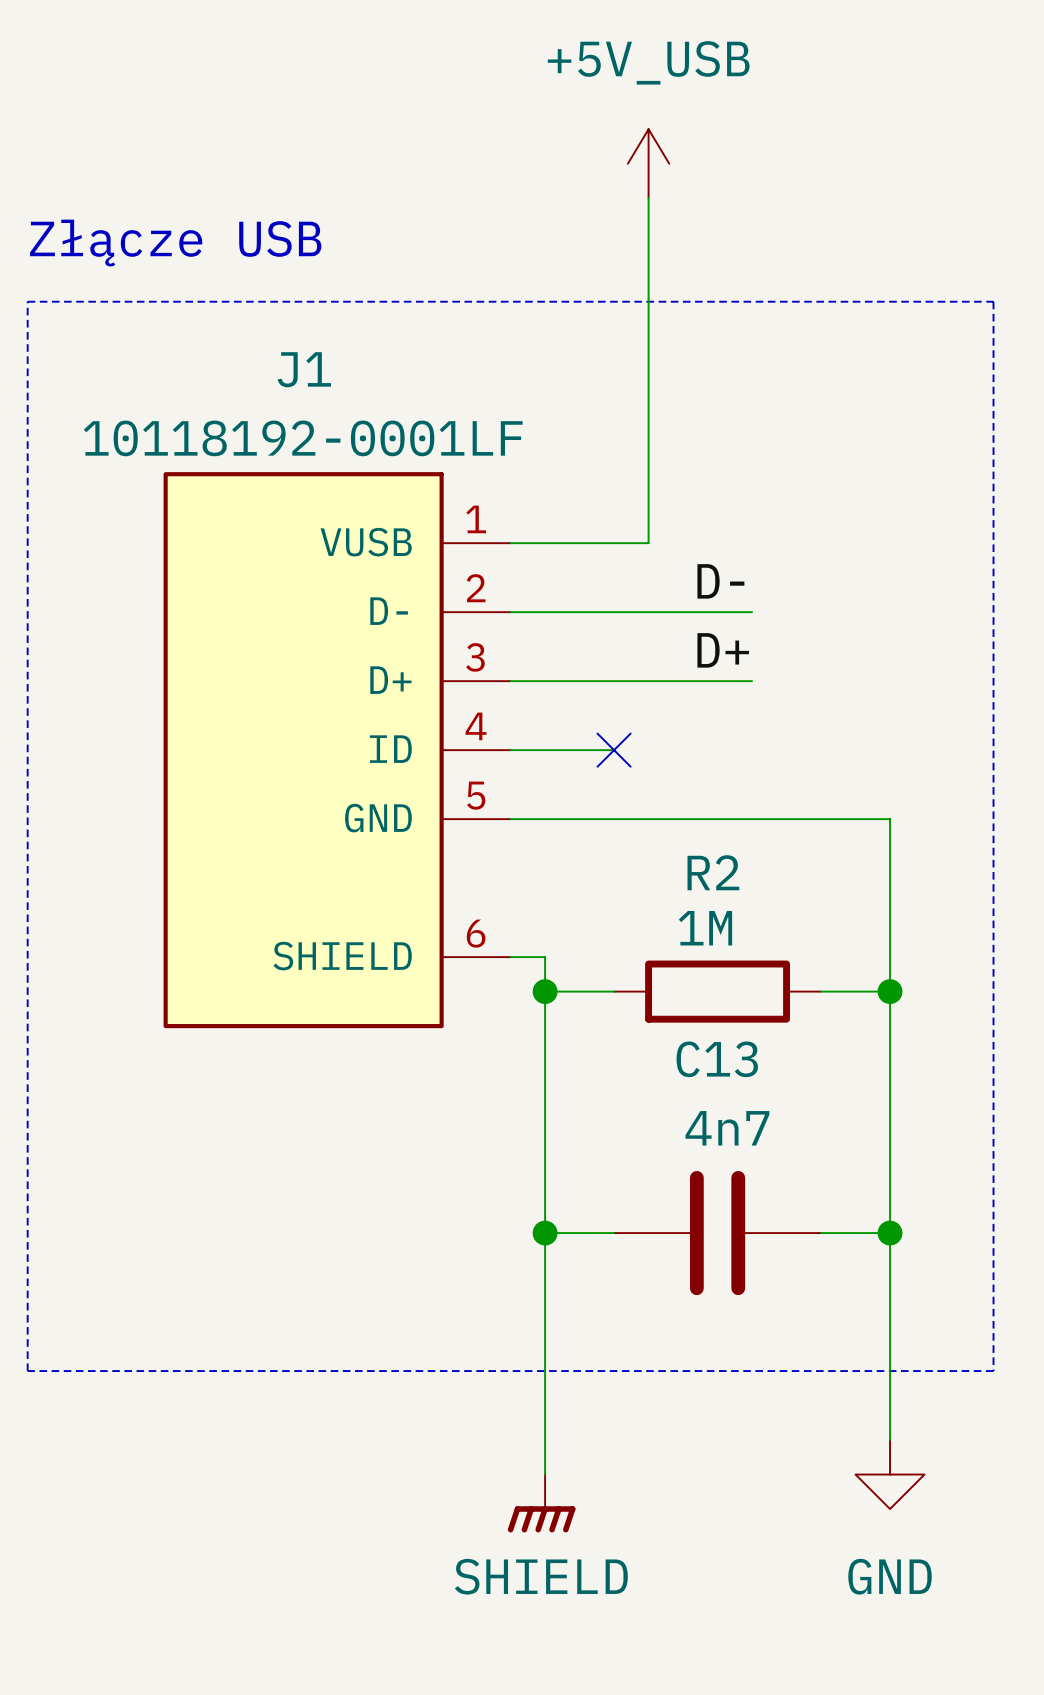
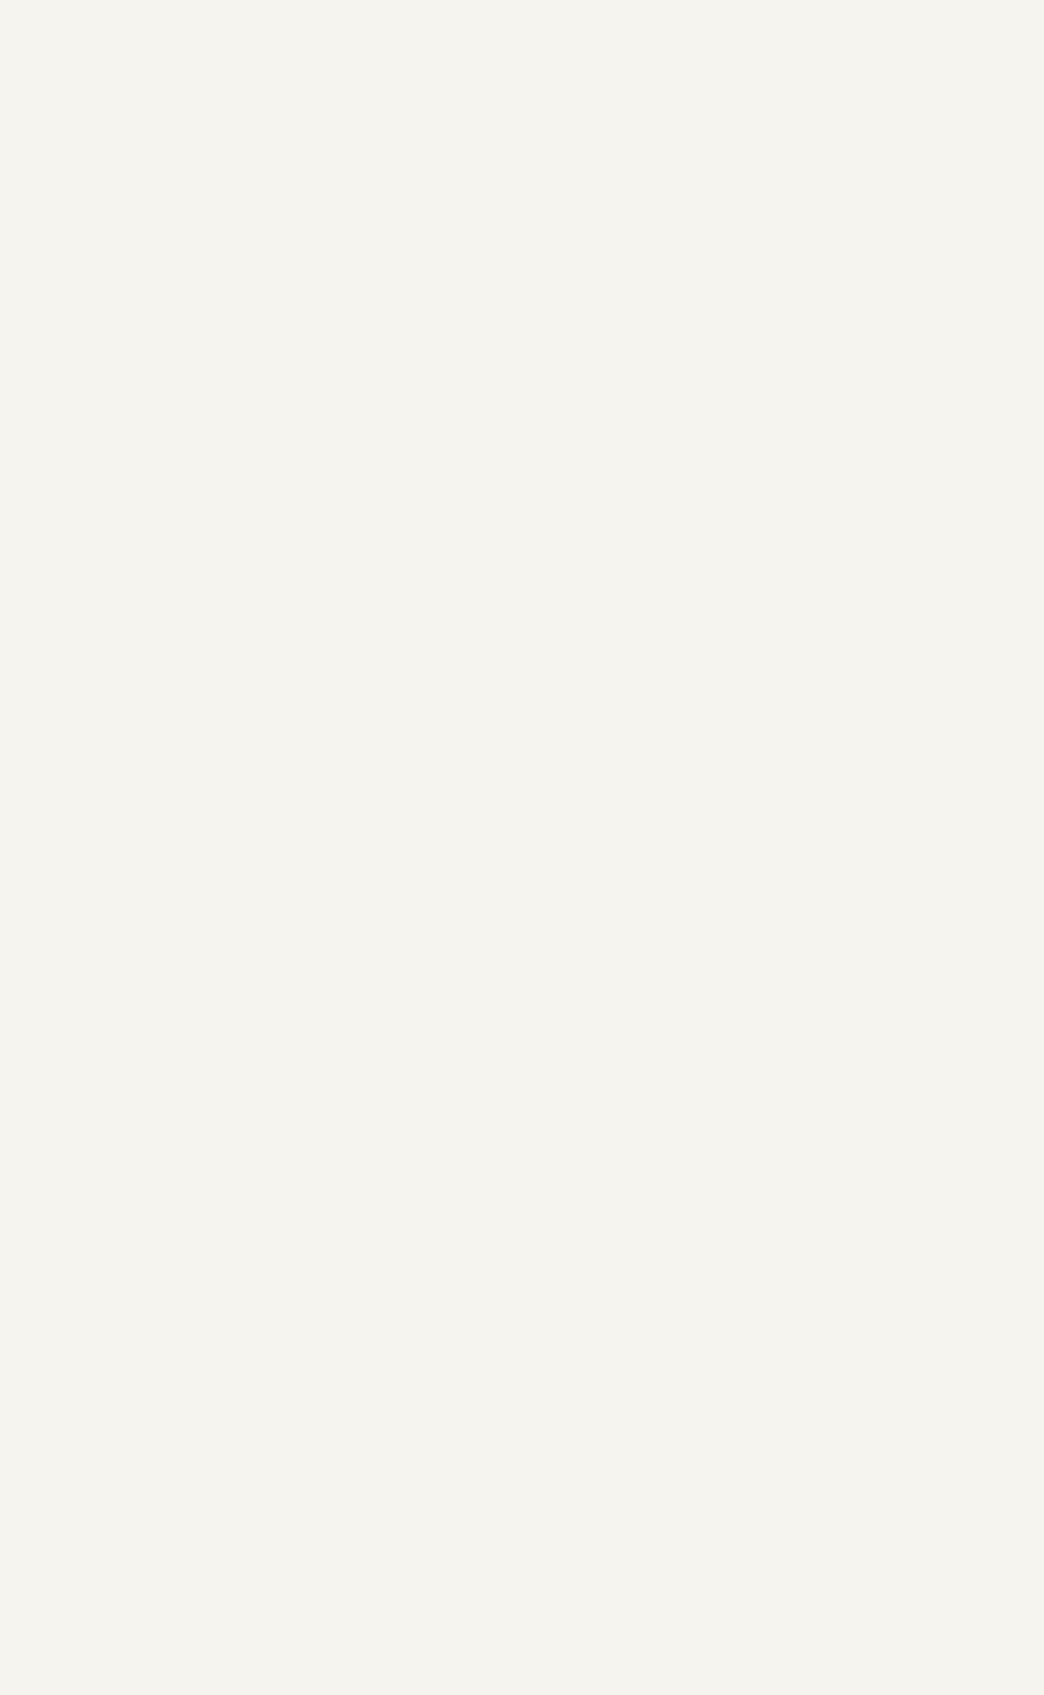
power symbol: +5V_USB (648, 163) -> none
wire: (648, 198) (648, 543) (510, 543) -> none
text: Złącze USB (175, 243) -> none
line: (27, 301) (993, 301) (993, 1371) (27, 1371) (27, 301) -> none
label: D- (720, 581) -> none
wire: (510, 612) (752, 612) -> none
label: D+ (723, 650) -> none
wire: (510, 681) (752, 681) -> none
J1: 10118192-0001LF (337, 750) -> none
wire: (510, 750) (614, 750) -> none
no-connect mark: (614, 750) -> none
wire: (510, 819) (890, 819) (890, 1440) -> none
wire: (510, 957) (545, 957) (545, 1474) -> none
wire: (545, 991) (614, 991) -> none
junction: (545, 991) -> none
R2: 1M (717, 991) -> none
wire: (821, 991) (890, 991) -> none
junction: (890, 991) -> none
wire: (545, 1233) (614, 1233) -> none
junction: (545, 1233) -> none
C13: 4n7 (717, 1233) -> none
wire: (821, 1233) (890, 1233) -> none
junction: (890, 1233) -> none
power symbol: GND (890, 1474) -> none
power symbol: SHIELD (541, 1503) -> none

